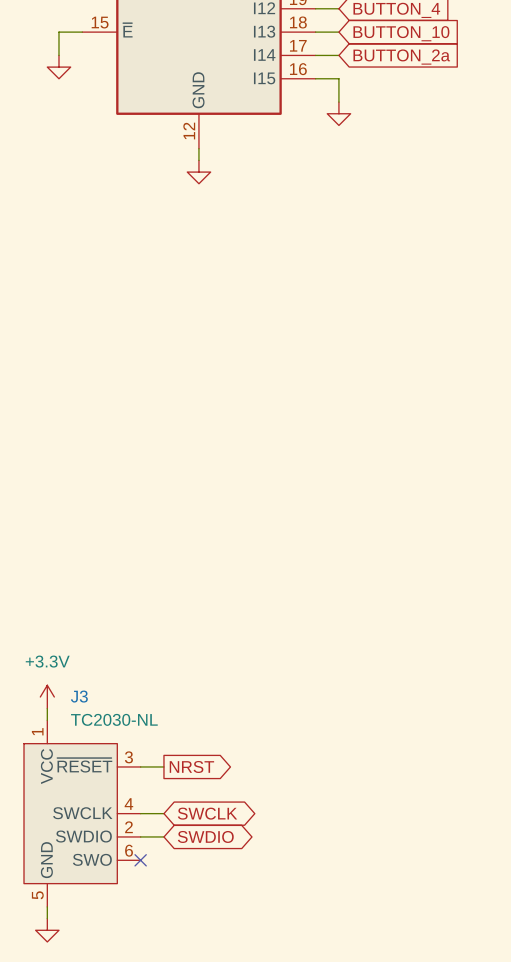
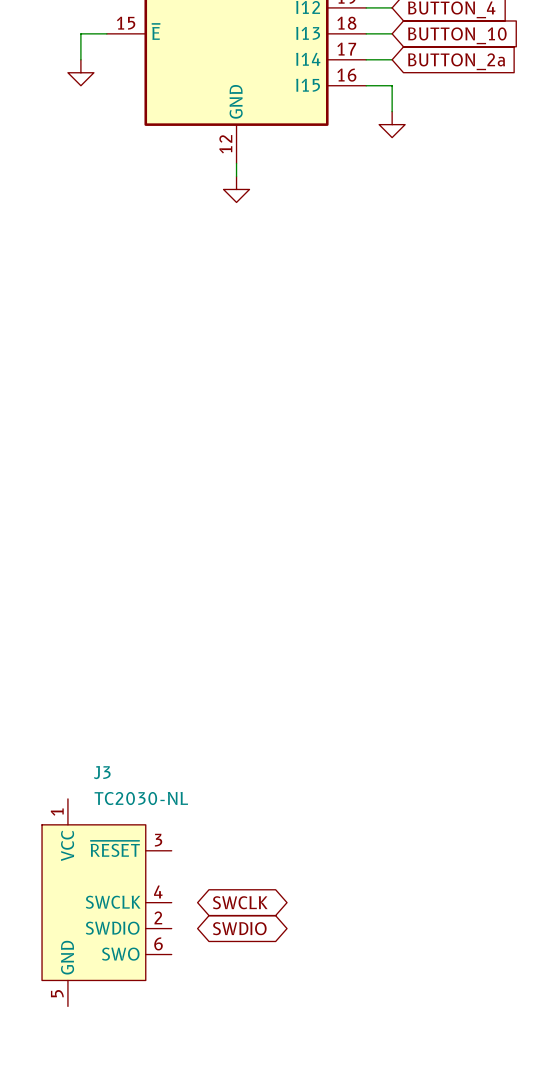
power symbol: +3.3V (47, 696) -> none
wire: (47, 708) (47, 720) -> none
wire: (140, 766) (163, 766) -> none
global label: NRST (191, 766) -> none
wire: (140, 813) (163, 813) -> none
wire: (140, 836) (163, 836) -> none
no-connect mark: (140, 860) -> none
wire: (47, 906) (47, 918) -> none
power symbol: (47, 930) -> none

